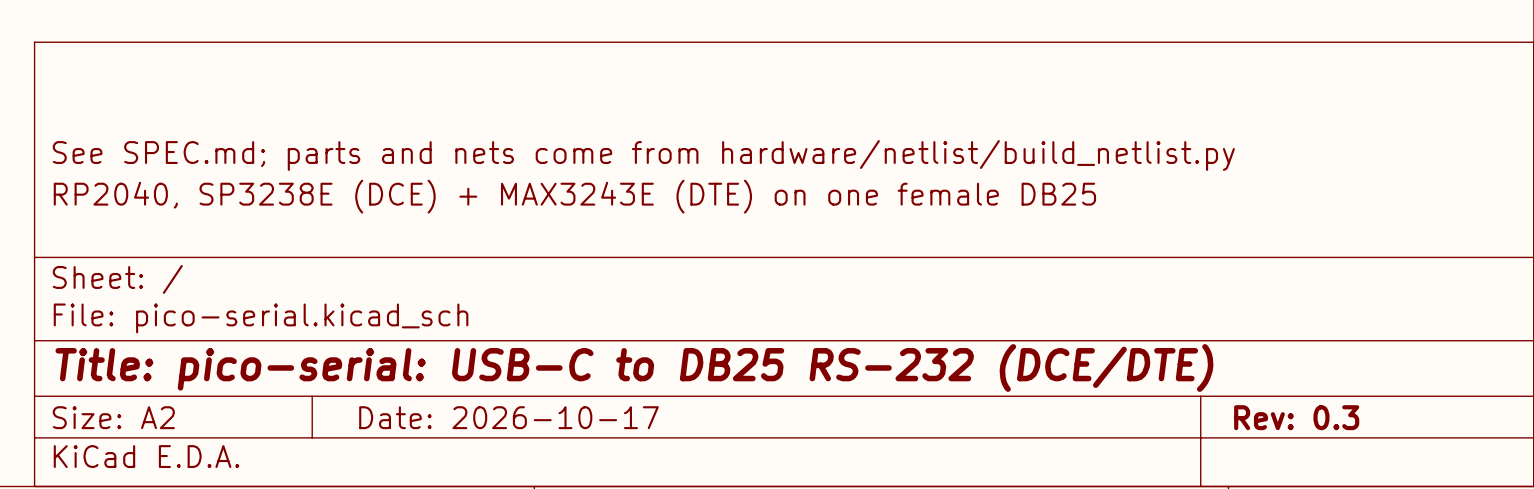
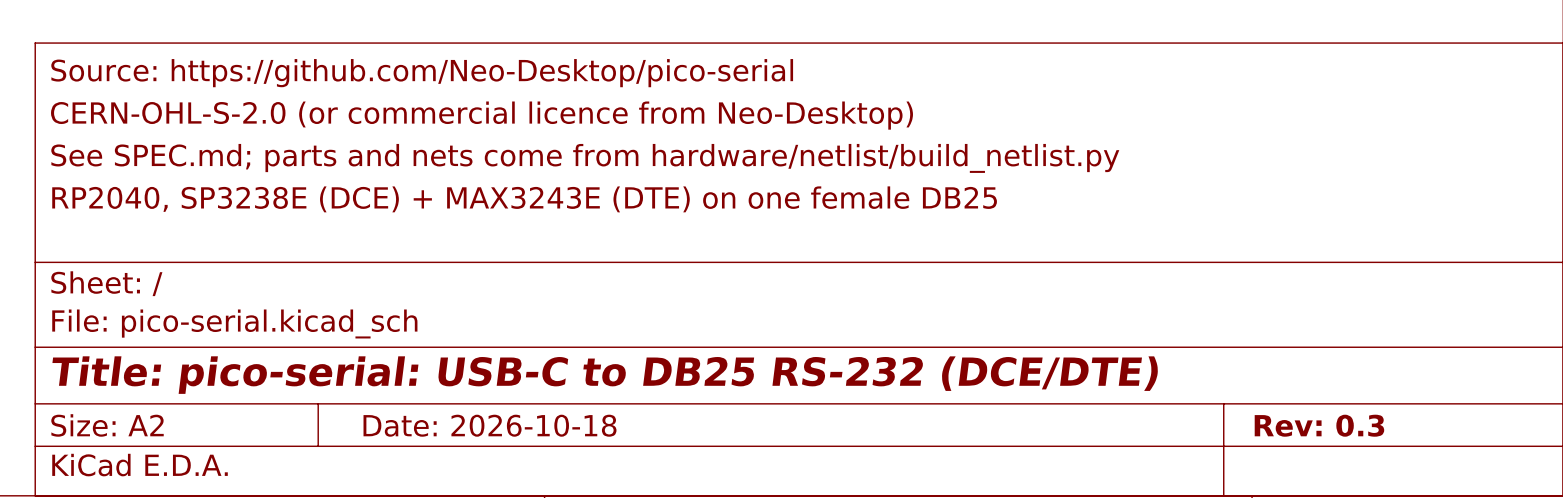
title block: none -> Source: https://github.com/Neo-Desktop/pico-serial (422, 73)
title block: none -> CERN-OHL-S-2.0 (or commercial licence from Neo-Desktop) (482, 115)
title block: Date: 2026-10-17 (508, 417) -> Date: 2026-10-18 (489, 425)

